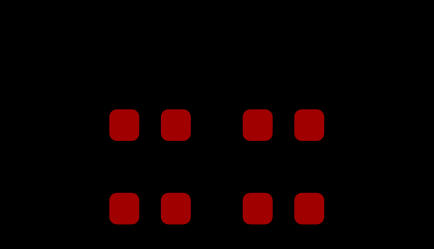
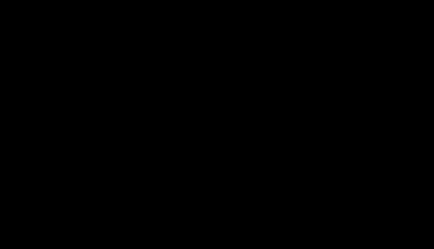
part: (150, 125) -> none
part: (283, 125) -> none
part: (150, 208) -> none
part: (283, 208) -> none

